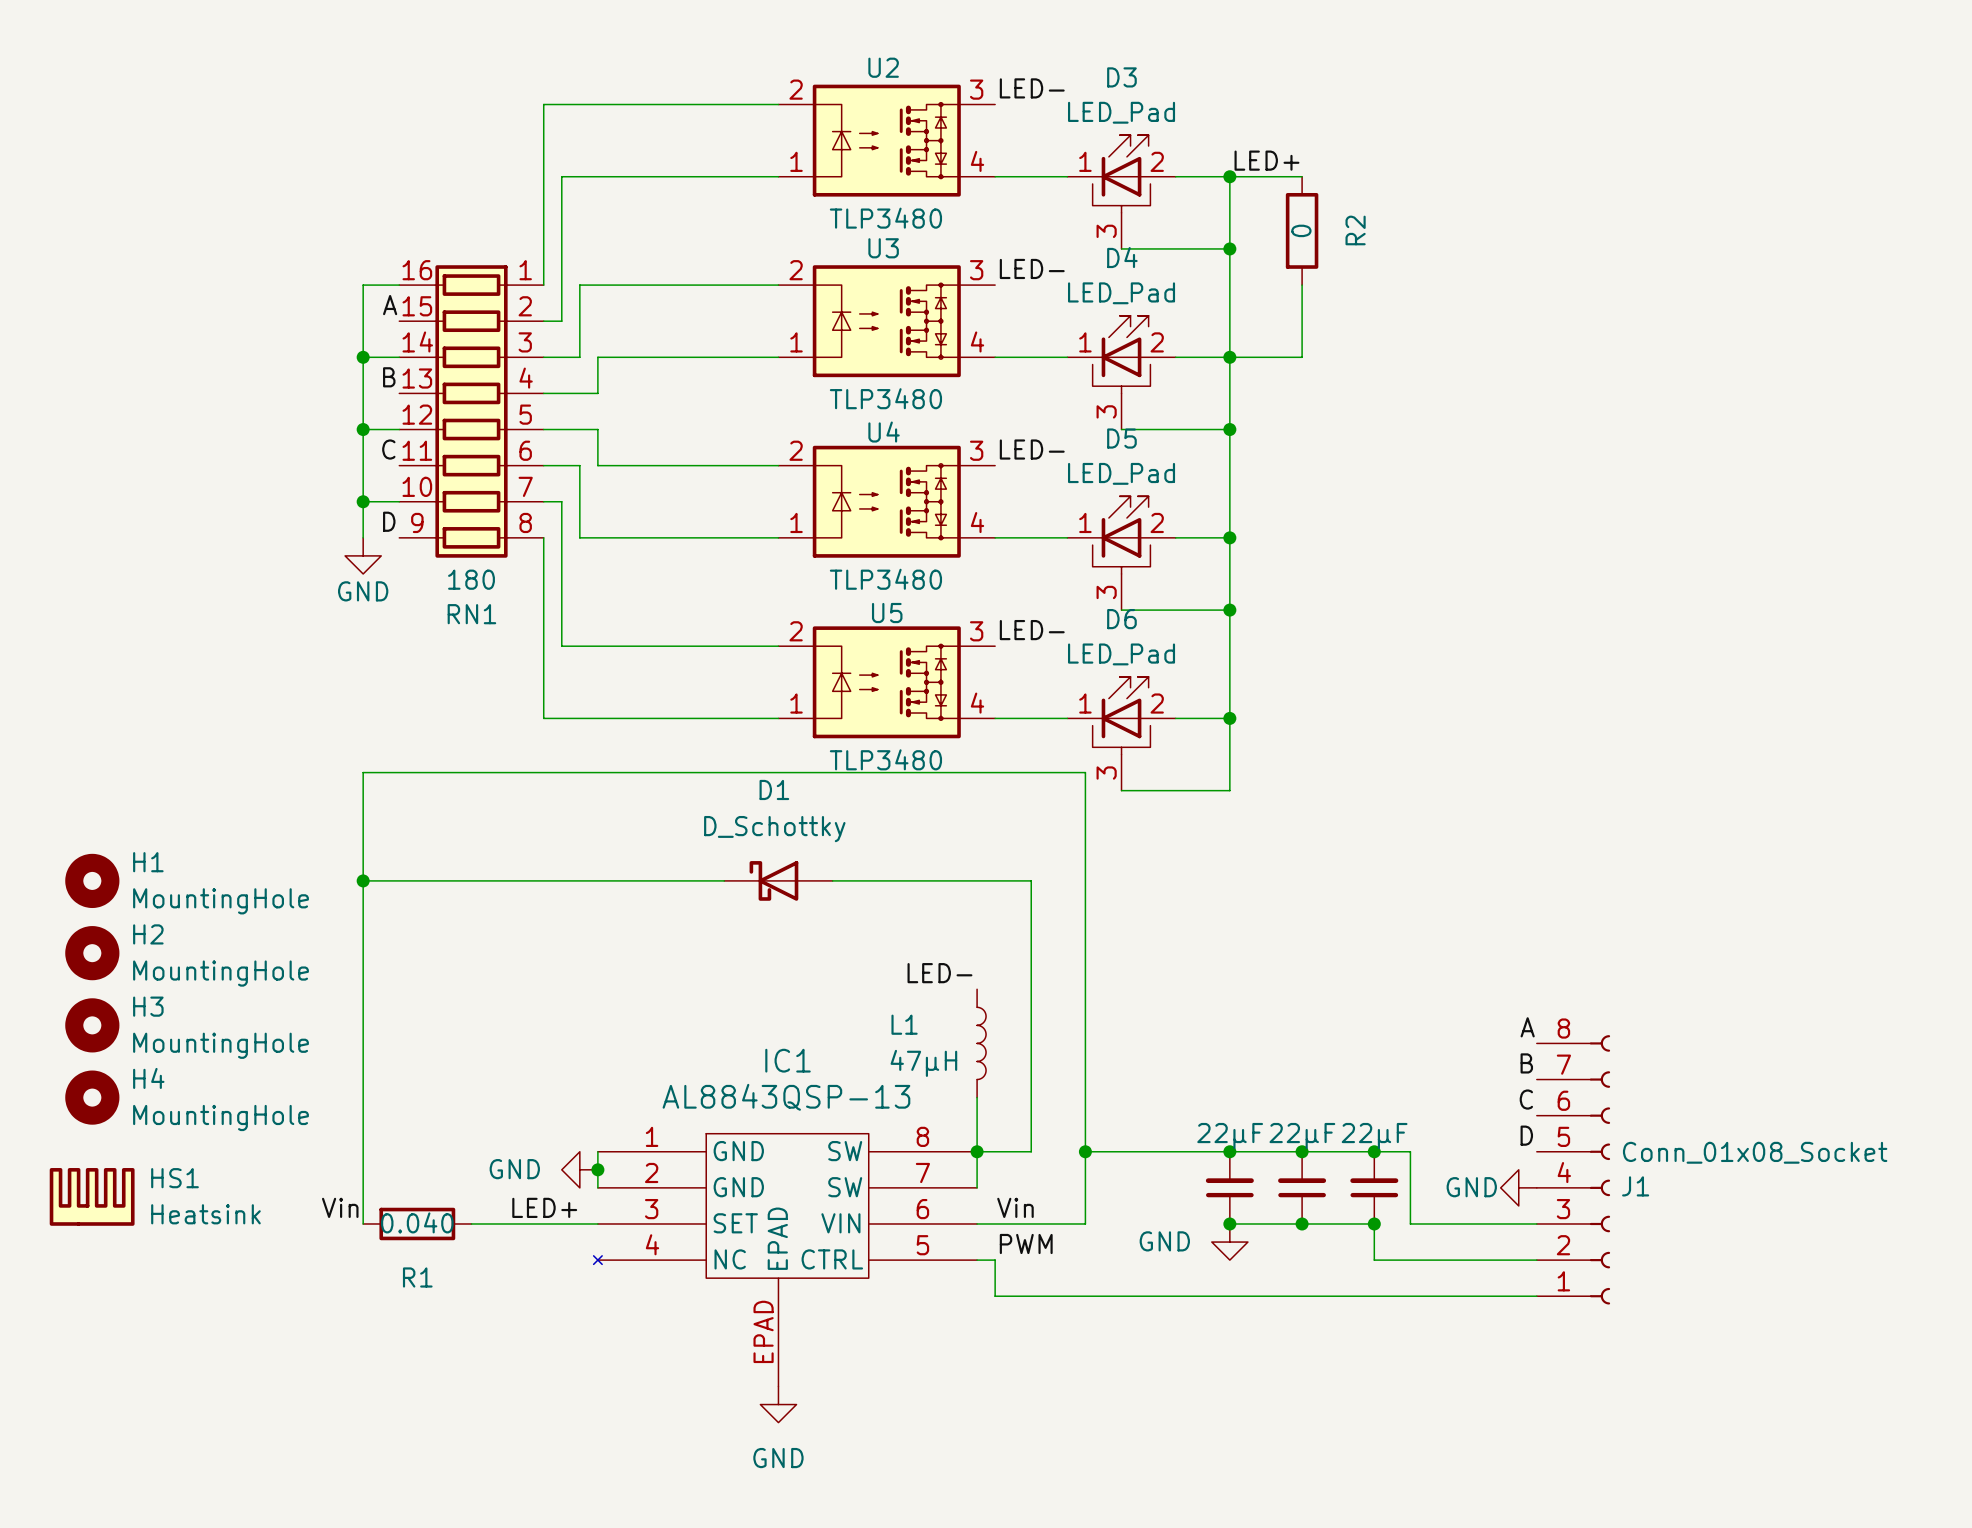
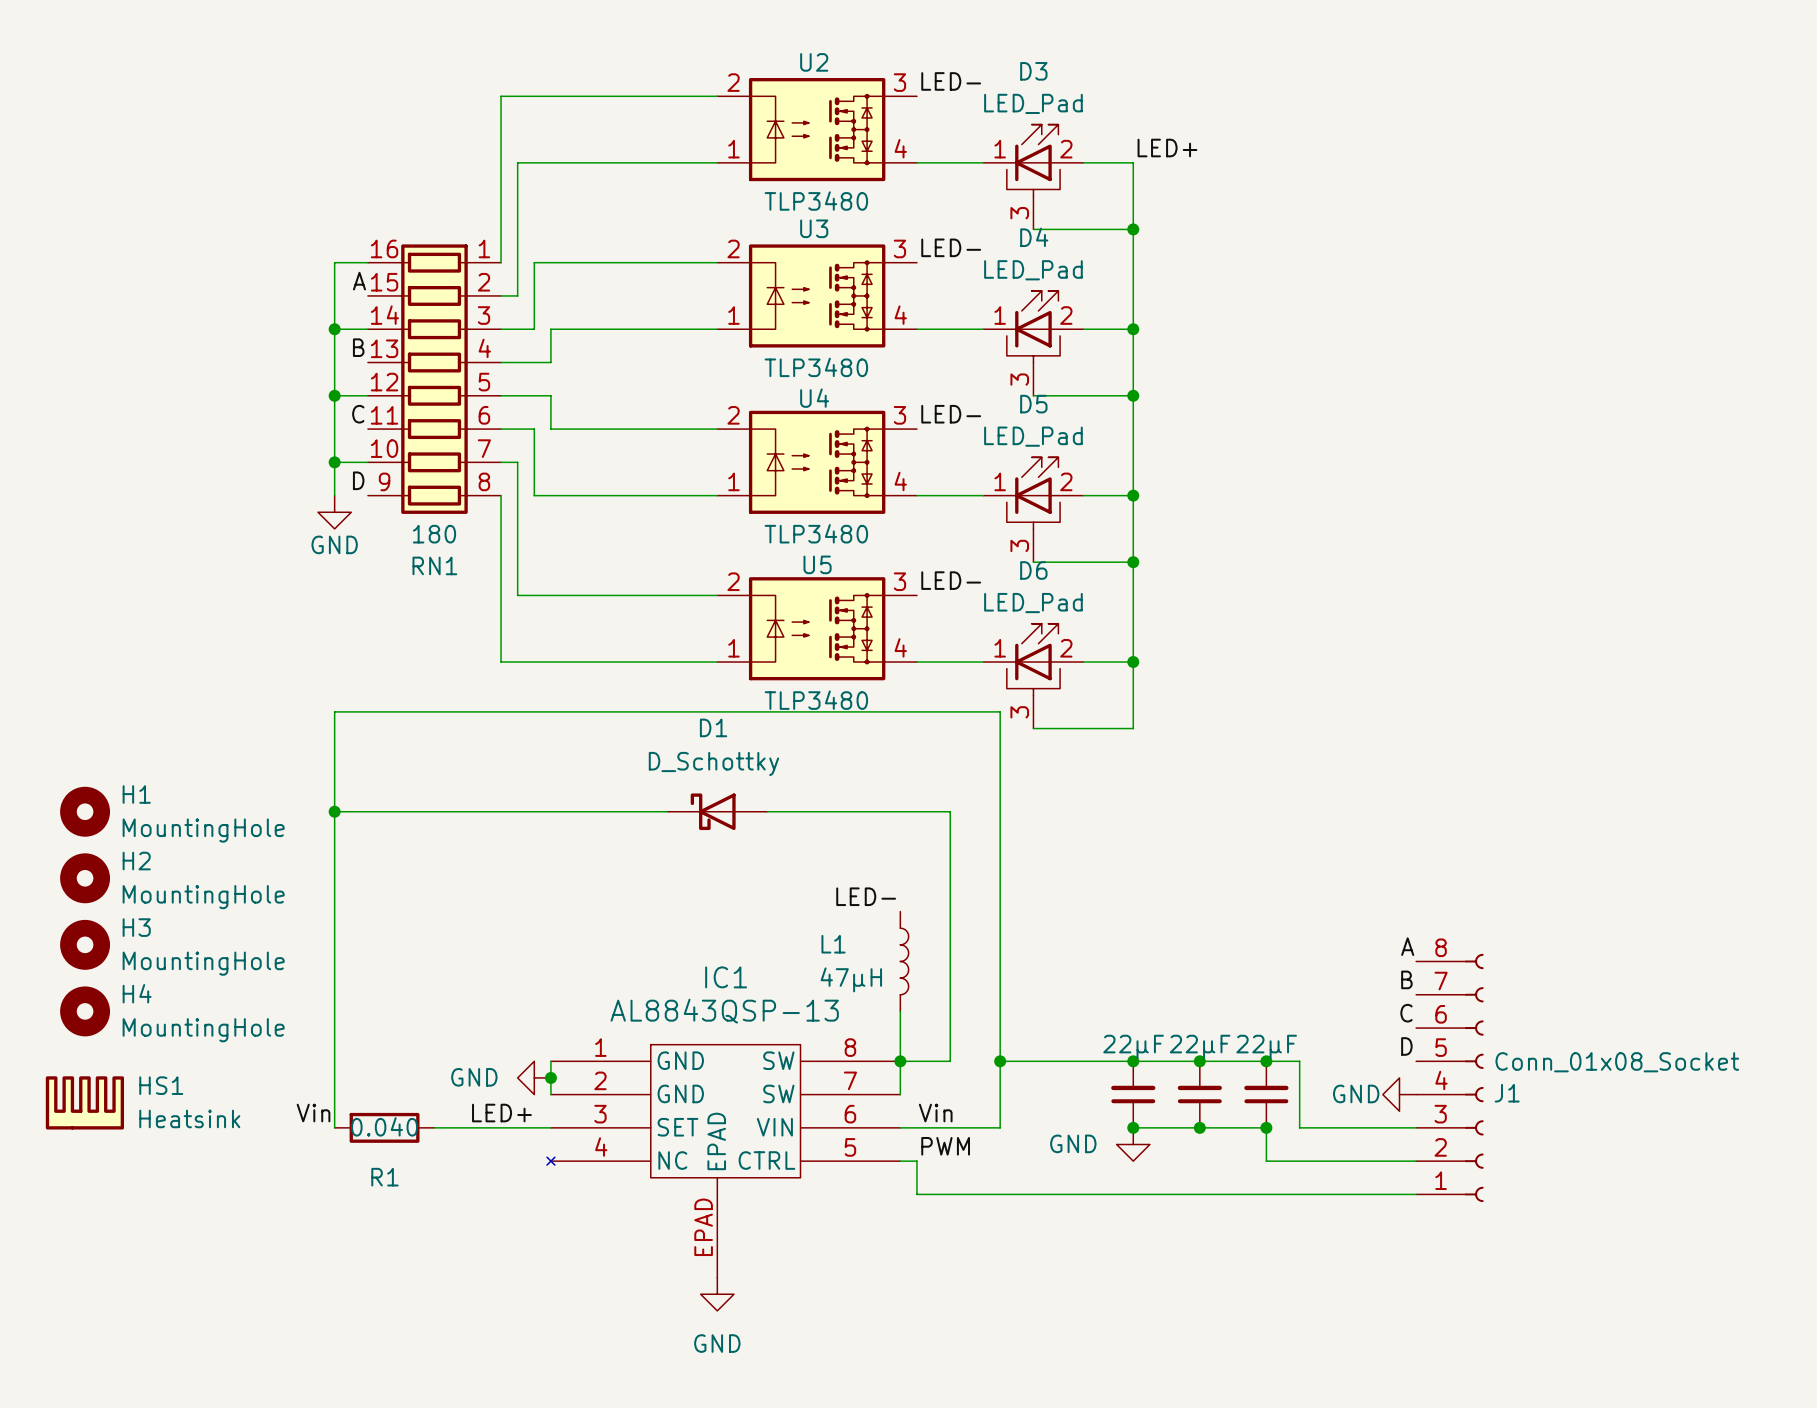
wire: (1229, 176) (1302, 176) -> none
junction: (1229, 176) -> none
R2: 0 (1302, 230) -> none
wire: (1302, 285) (1302, 357) (1229, 357) -> none

